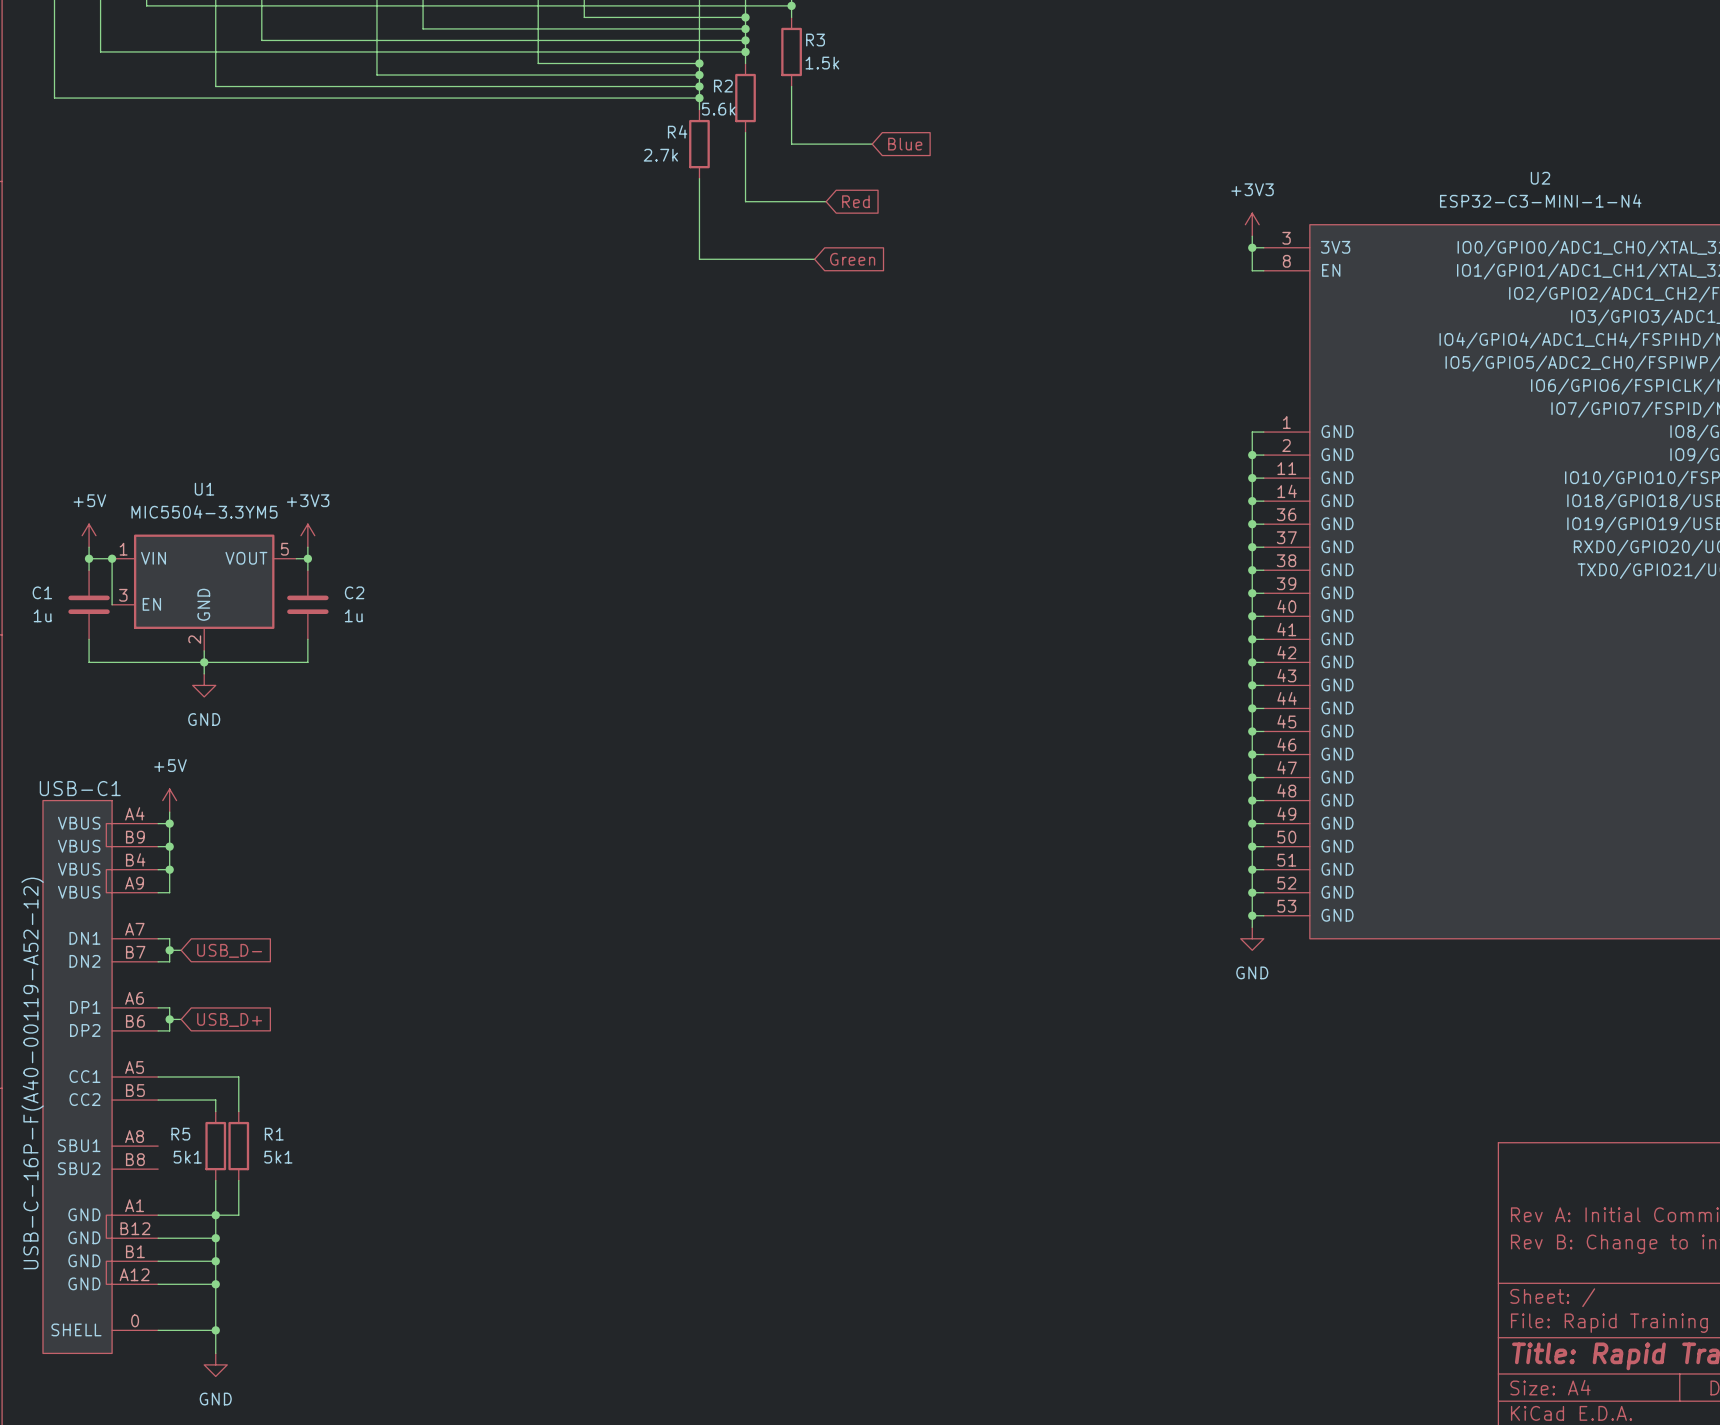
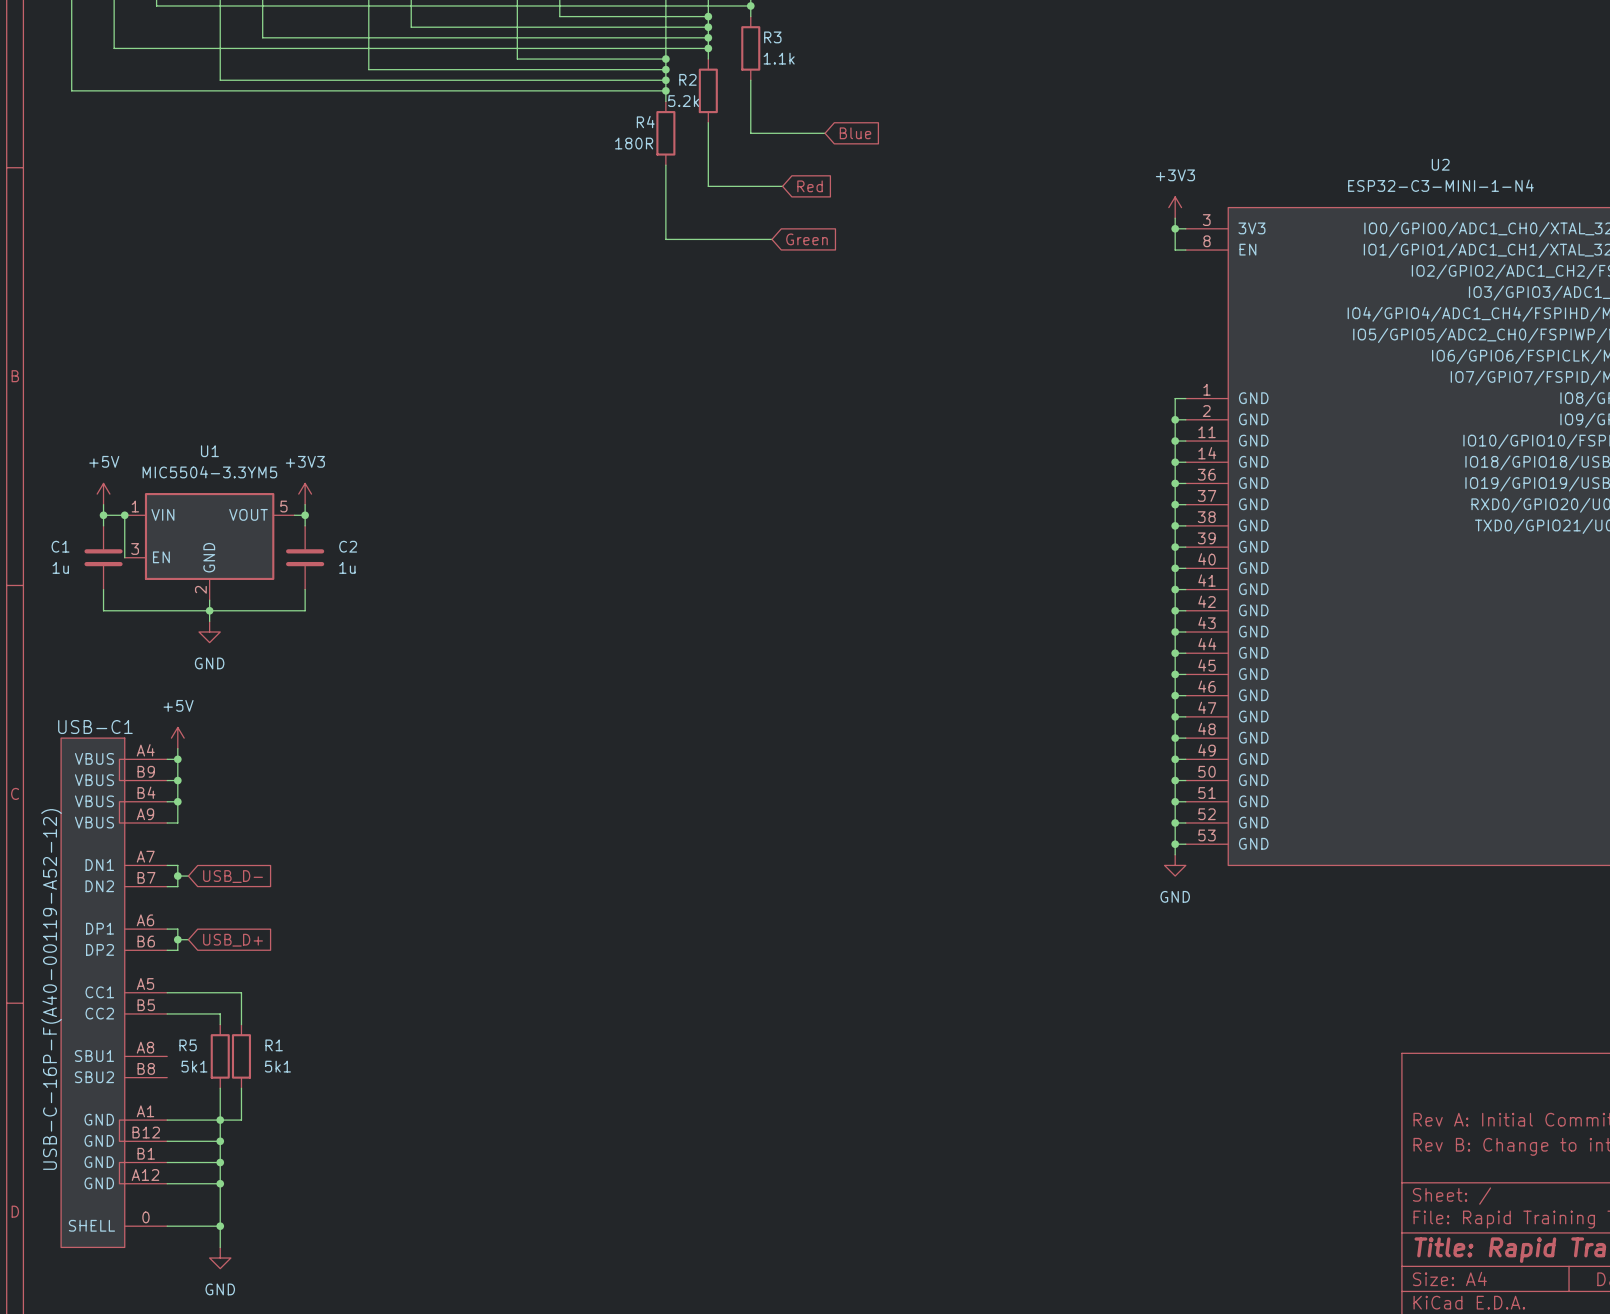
R3 value: 1.5k (822, 63) -> 1.1k (779, 58)
R2 value: 5.6k (718, 109) -> 5.2k (683, 101)
R4 value: 2.7k (660, 155) -> 180R (634, 143)

